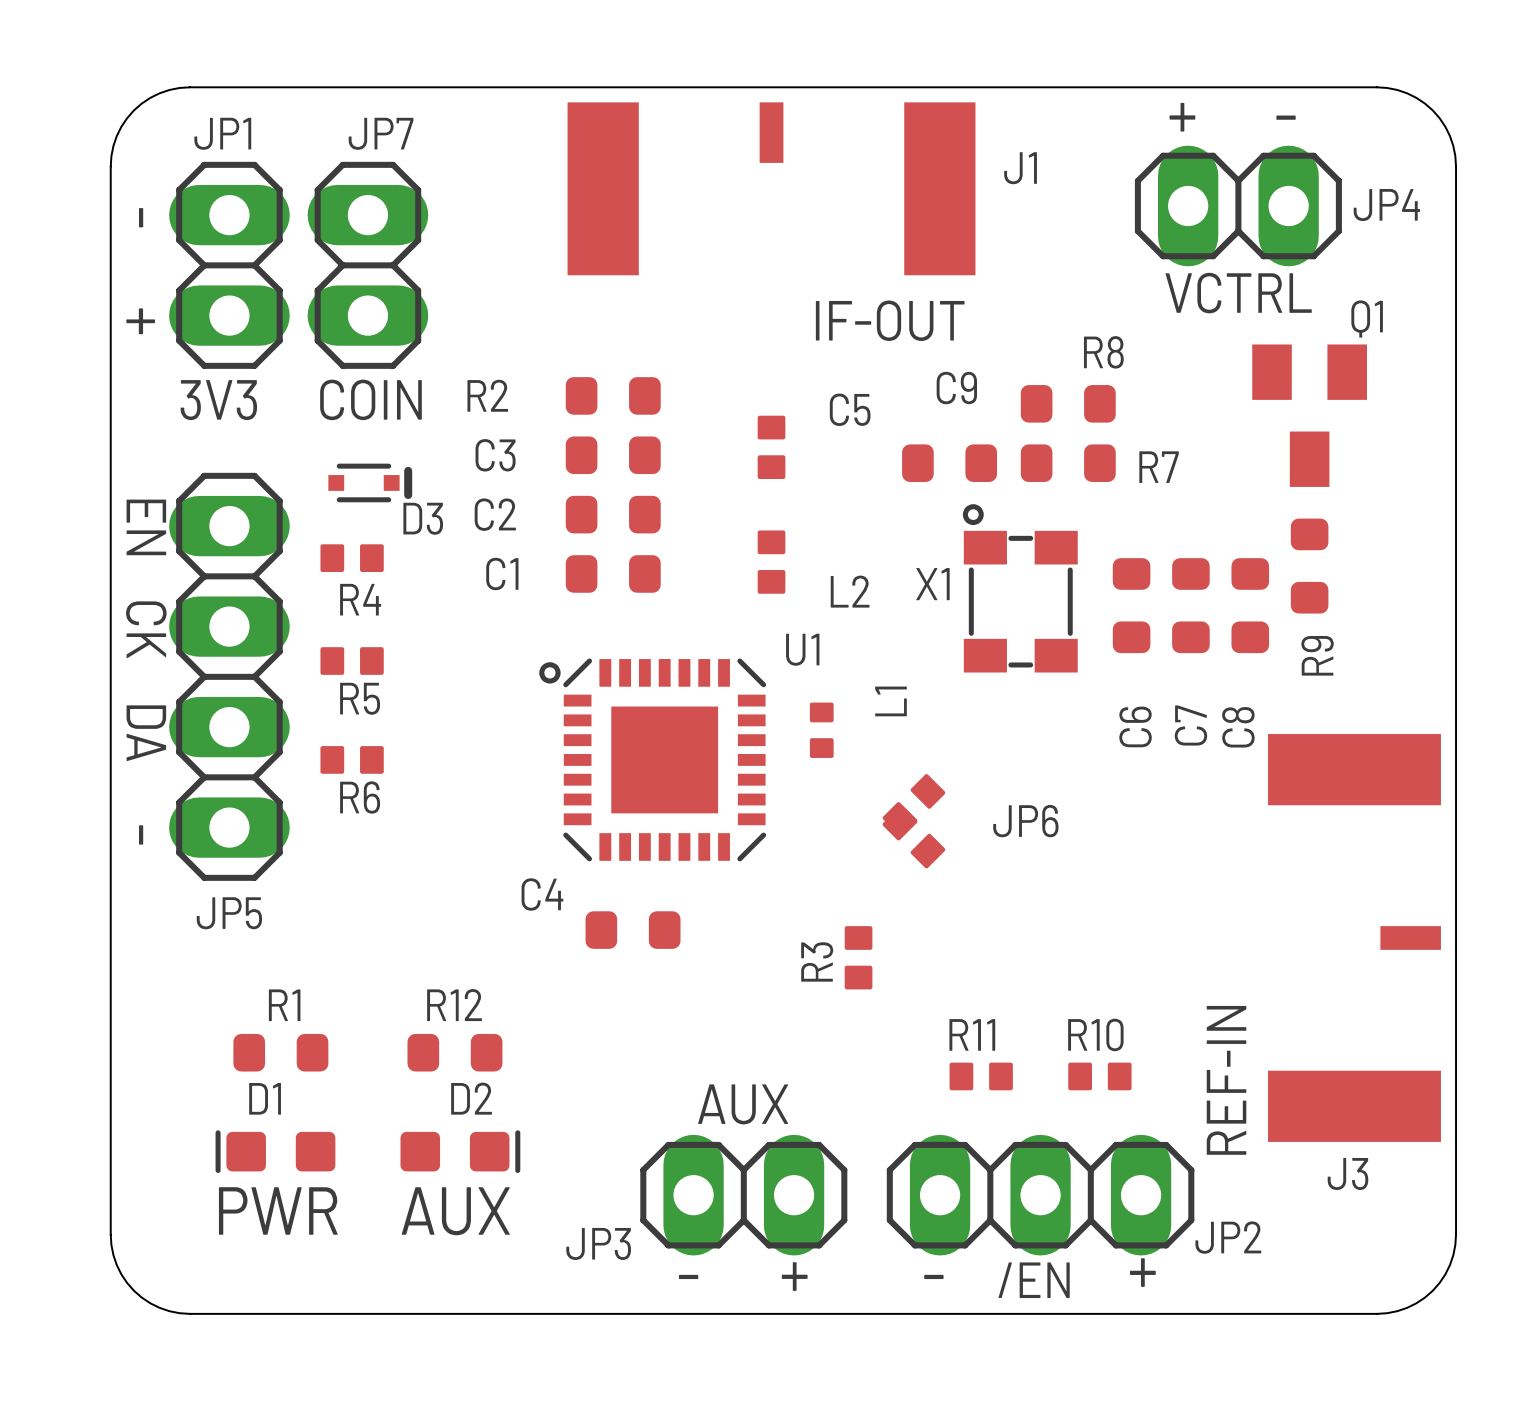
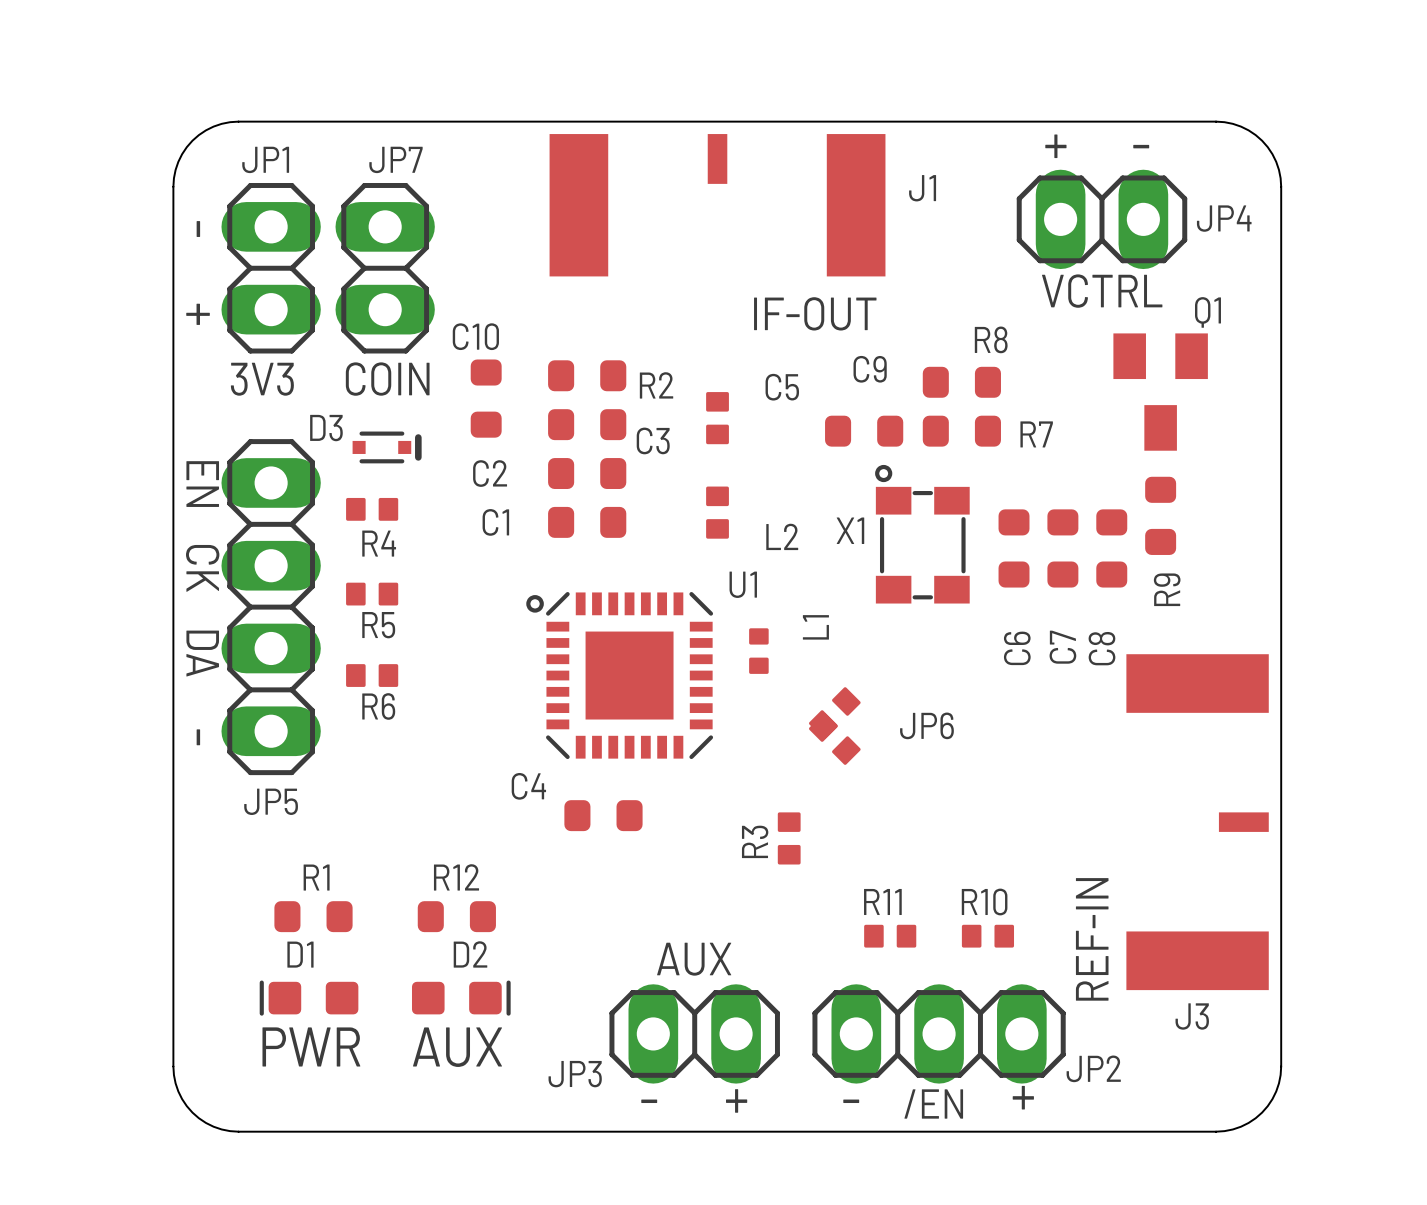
R2 name position: R2 (487, 395) -> R2 (656, 385)
C10: none -> (486, 398)
C3 name position: C3 (495, 455) -> C3 (653, 440)
text position: D3 (423, 518) -> D3 (326, 428)

